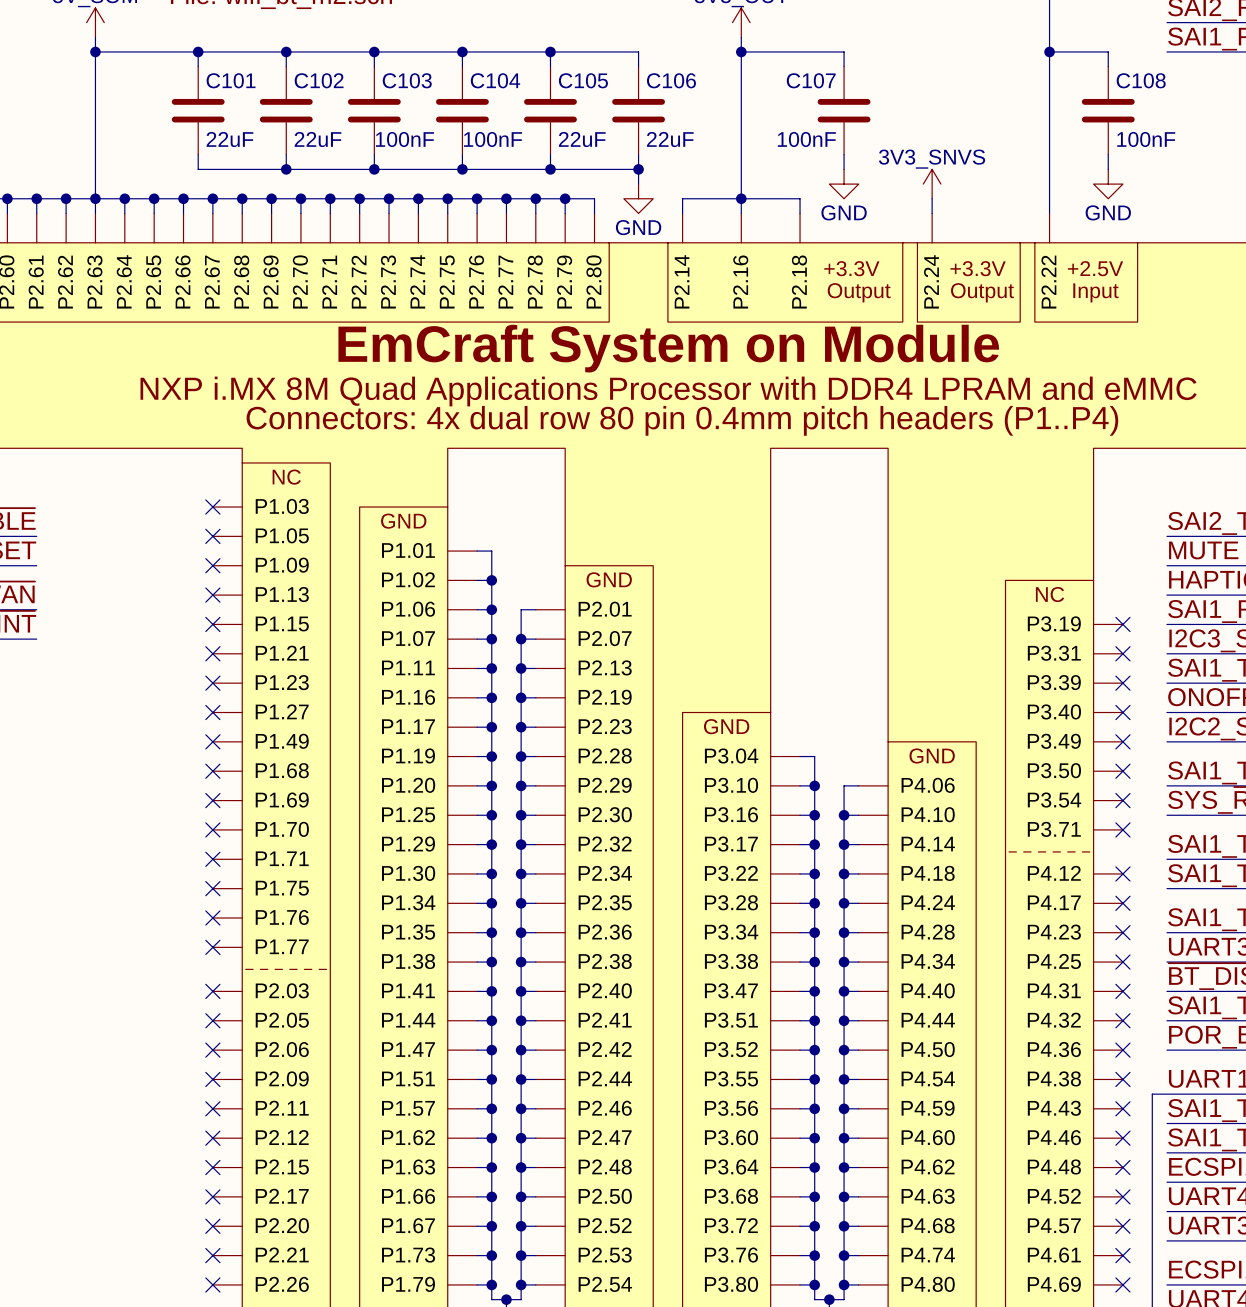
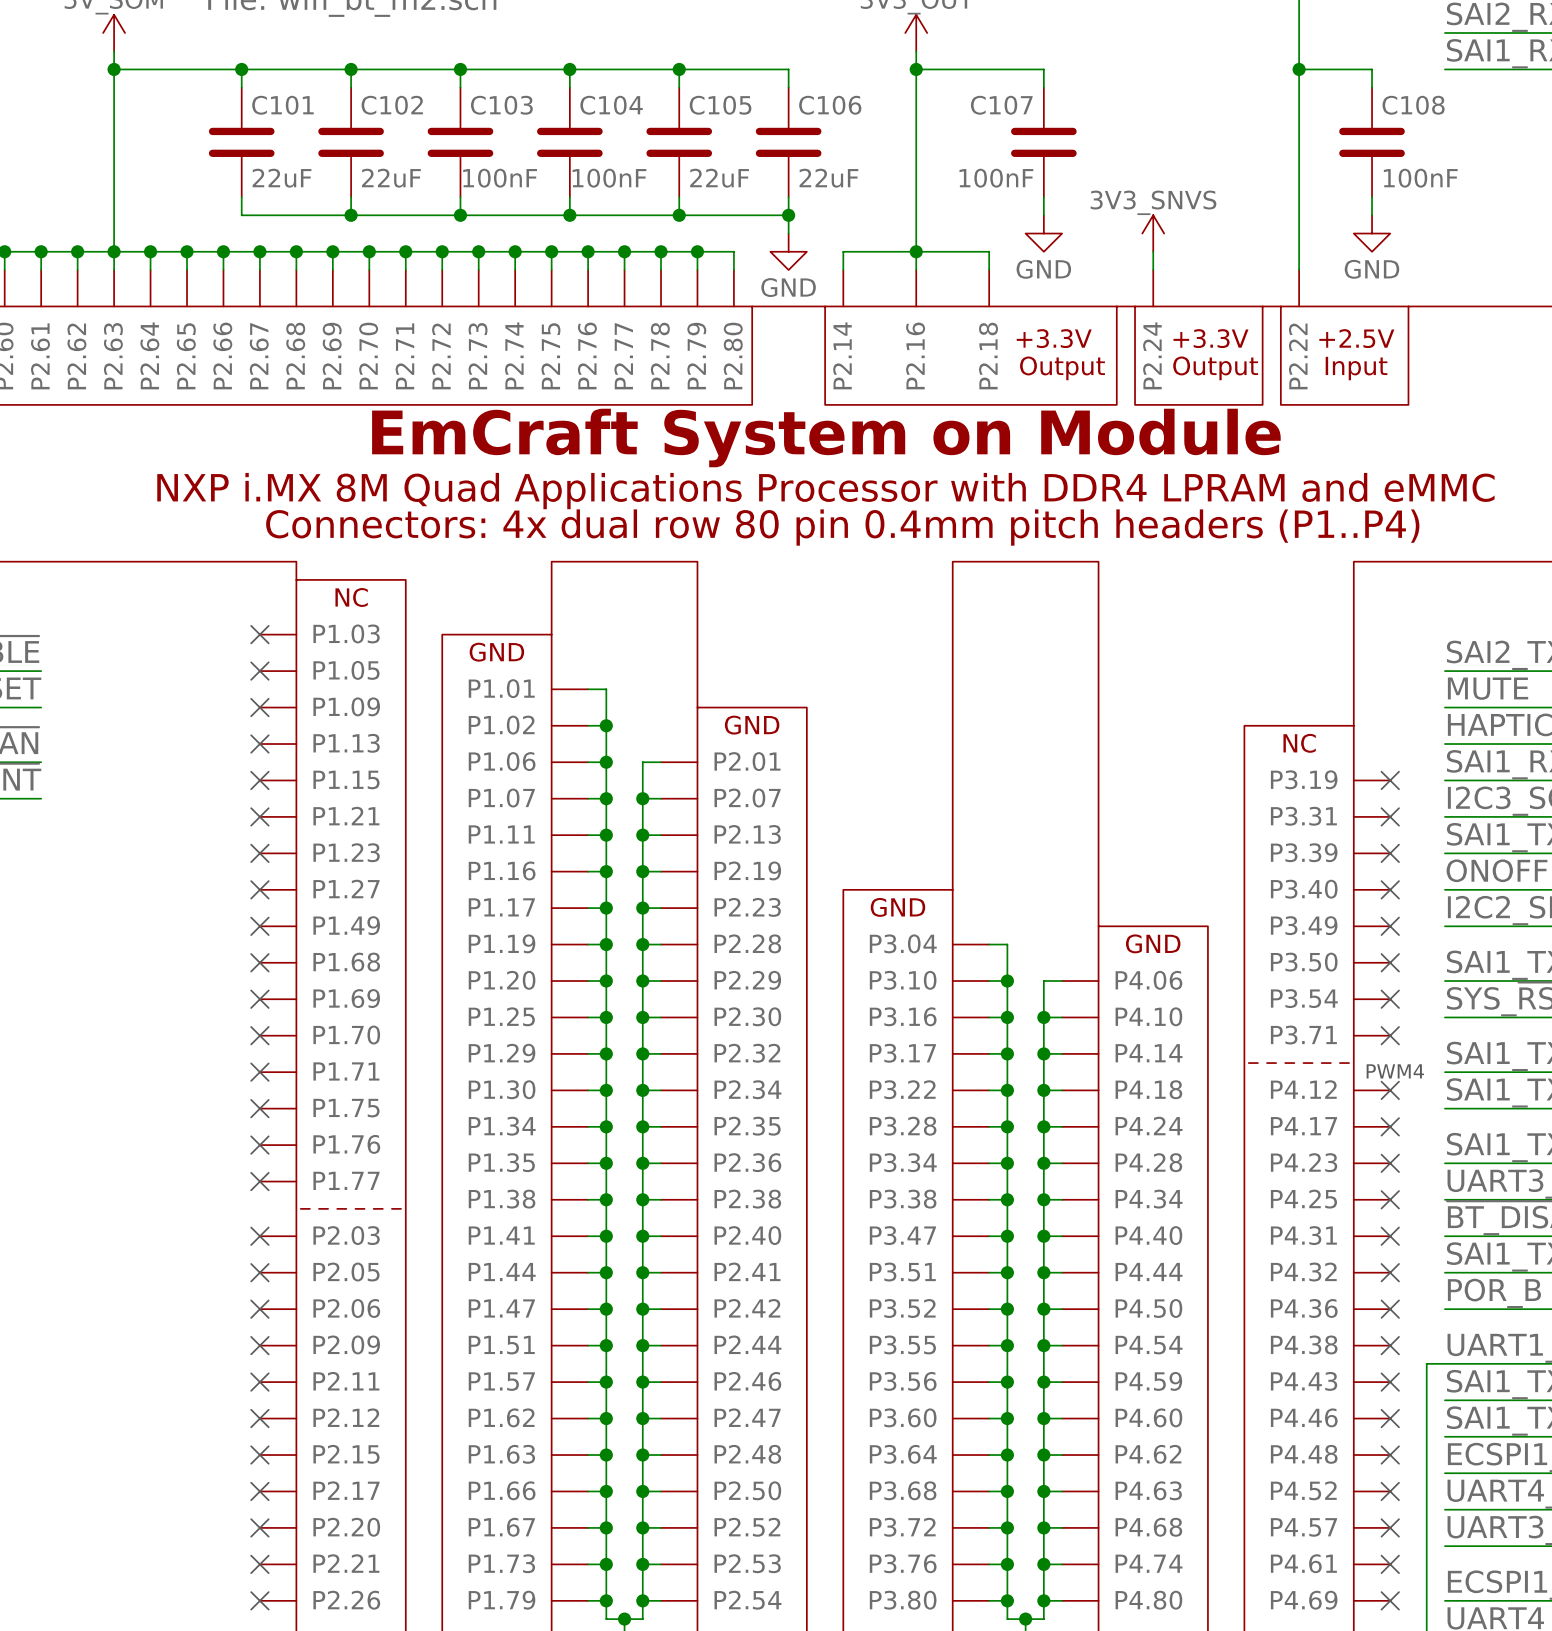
text: none -> PWM4 (1395, 1071)

